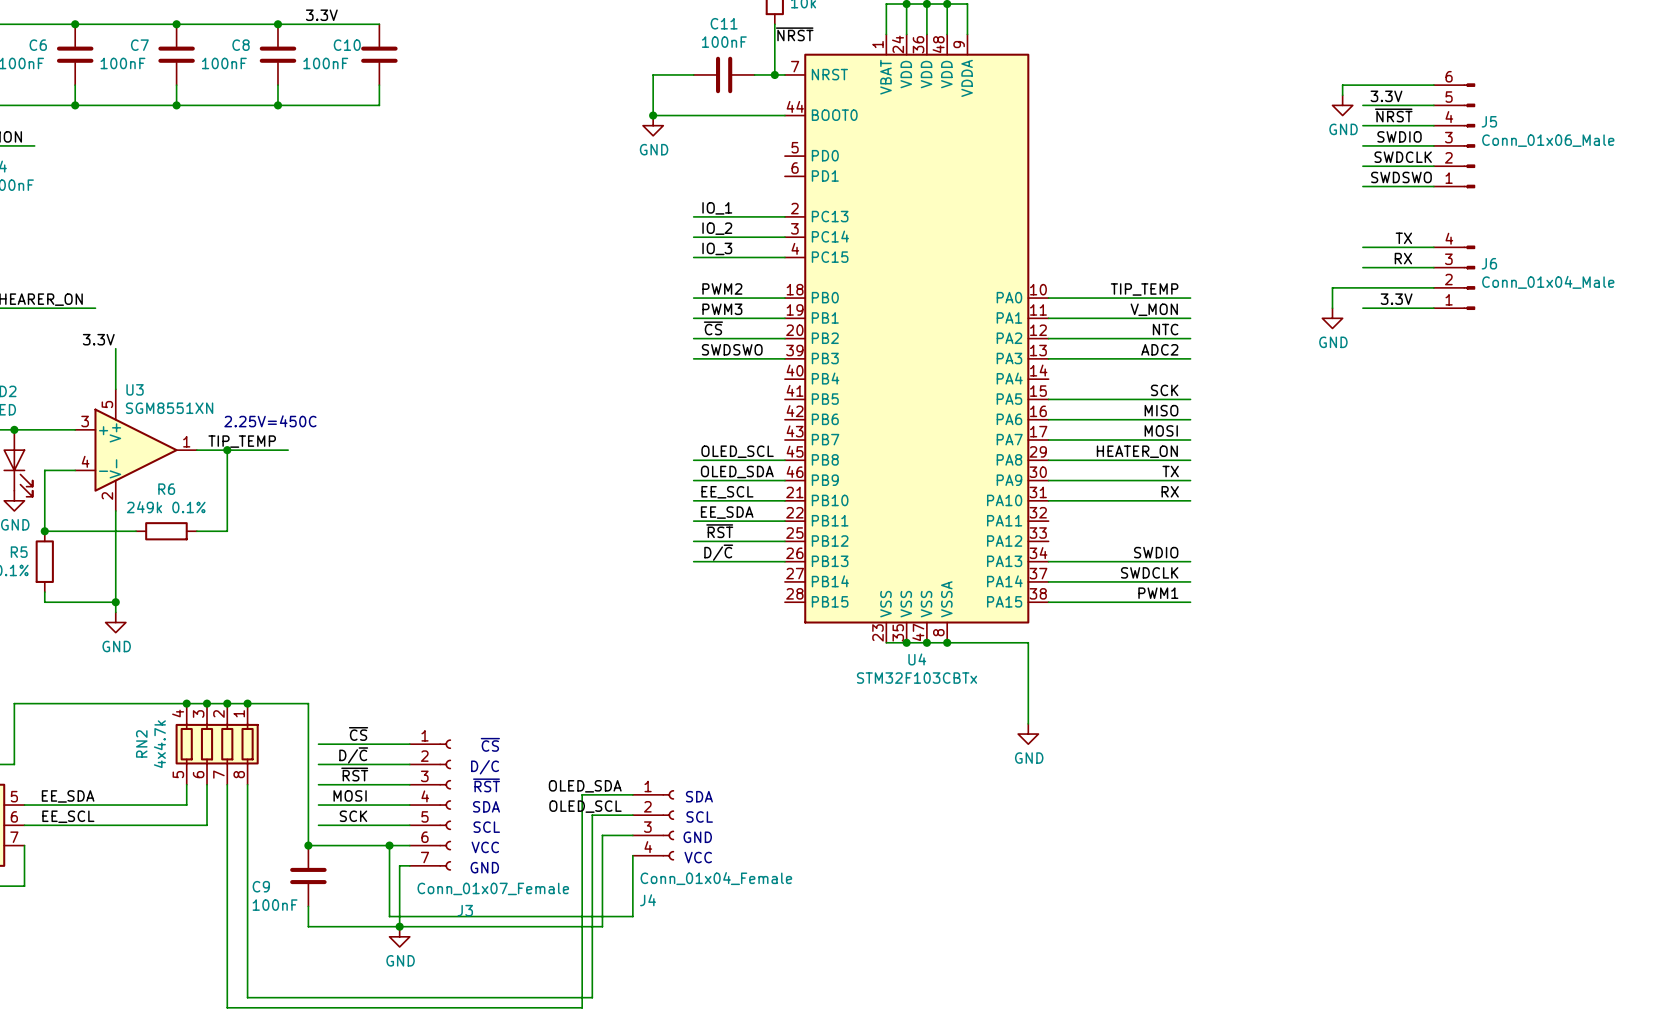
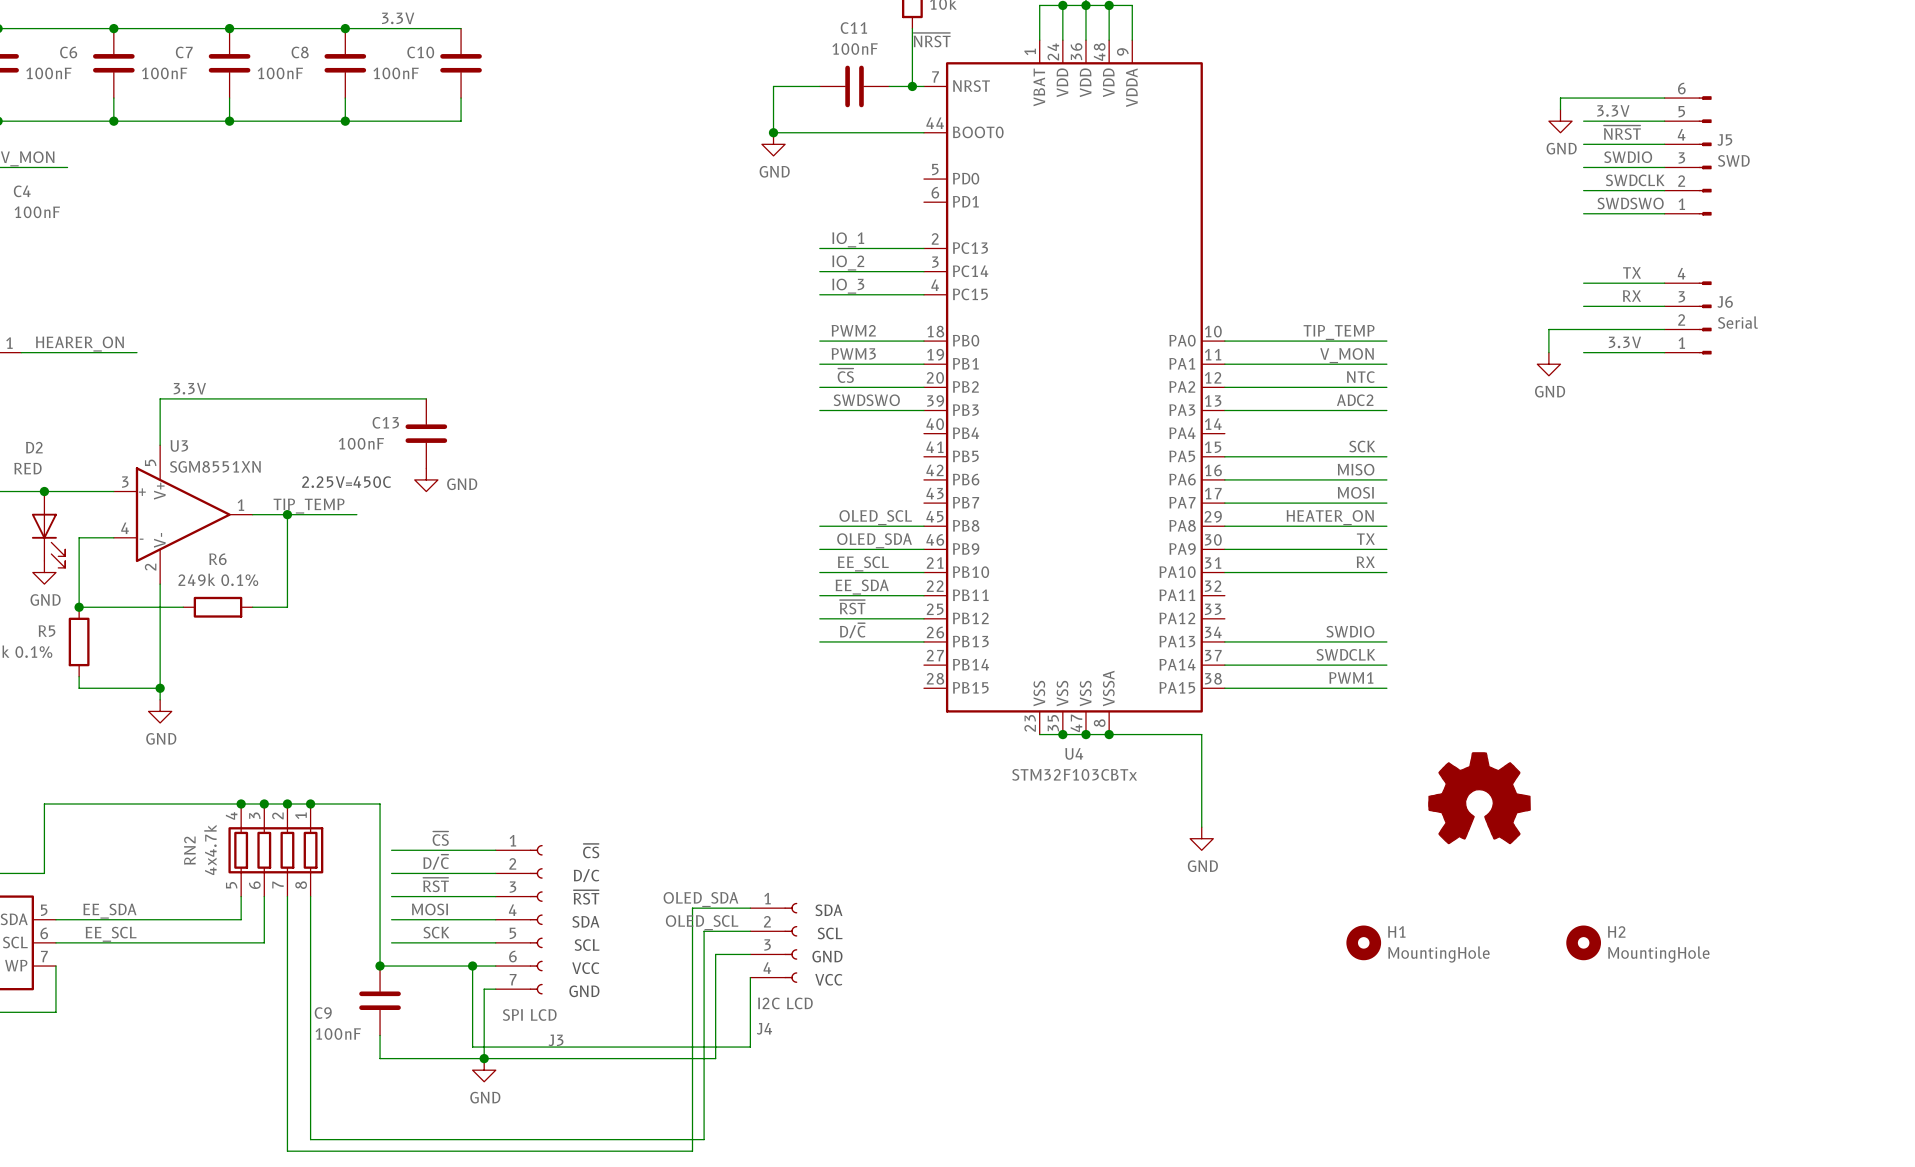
J5 value: Conn_01x06_Male (1548, 140) -> SWD (1733, 160)
J6 value: Conn_01x04_Male (1548, 282) -> Serial (1737, 322)
label position: 3.3V (98, 339) -> 3.3V (189, 388)
wire: none -> (160, 398) (426, 398)
C13: none -> 100nF (426, 433)
power symbol: none -> GND (426, 479)
power symbol: none -> (1479, 798)
H1: none -> MountingHole (1363, 942)
H2: none -> MountingHole (1583, 942)
J4 value: Conn_01x04_Female (716, 878) -> I2C LCD (785, 1003)
J3 value: Conn_01x07_Female (493, 888) -> SPI LCD (529, 1015)

